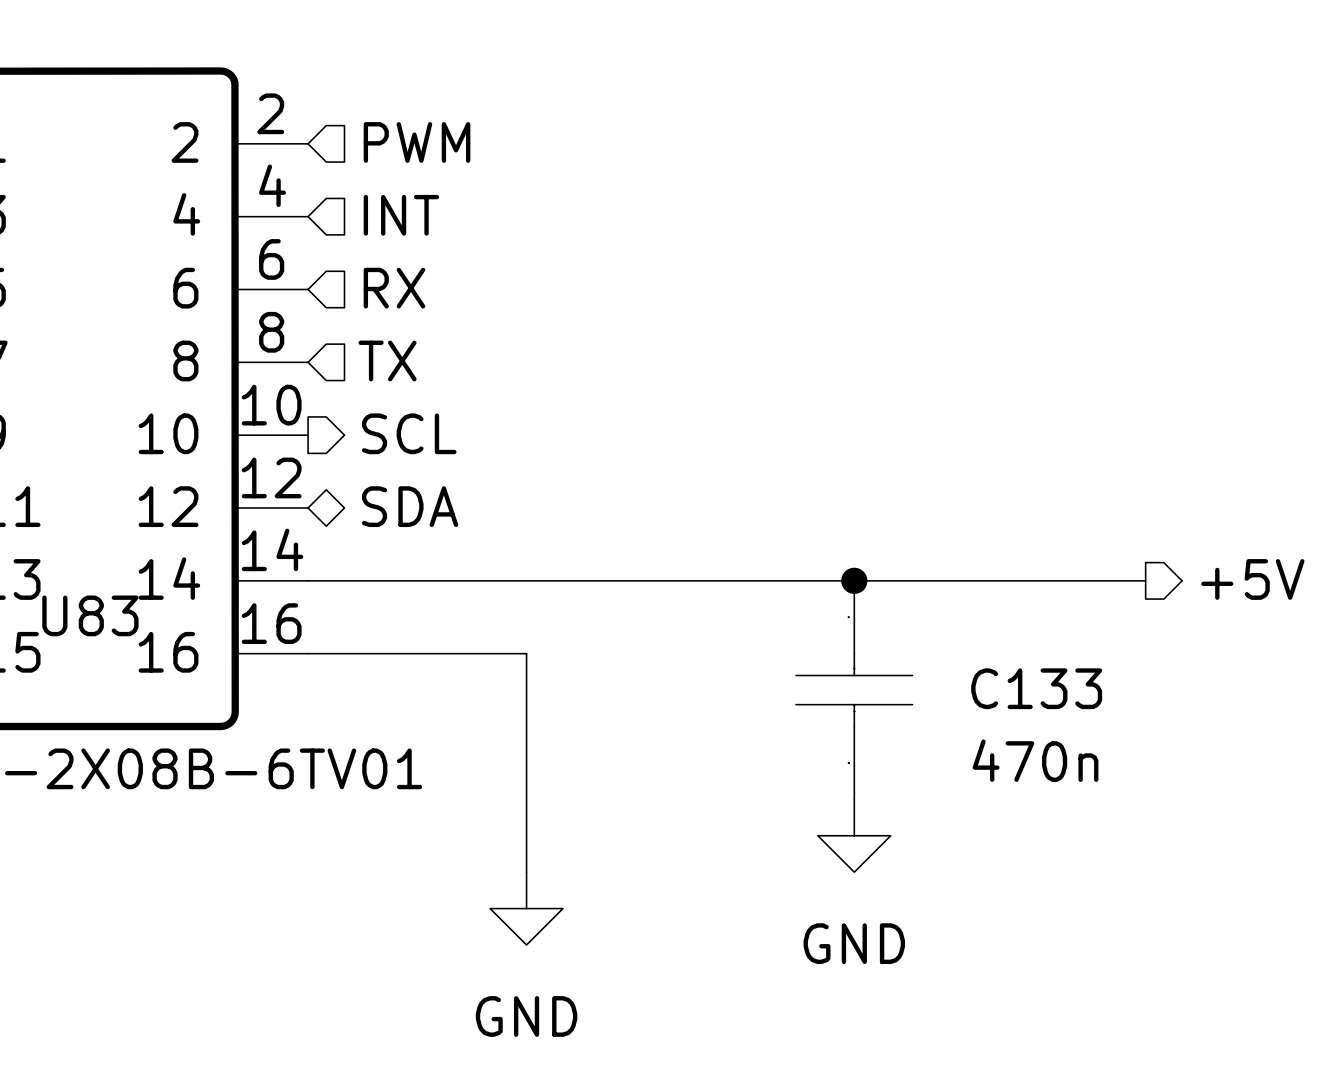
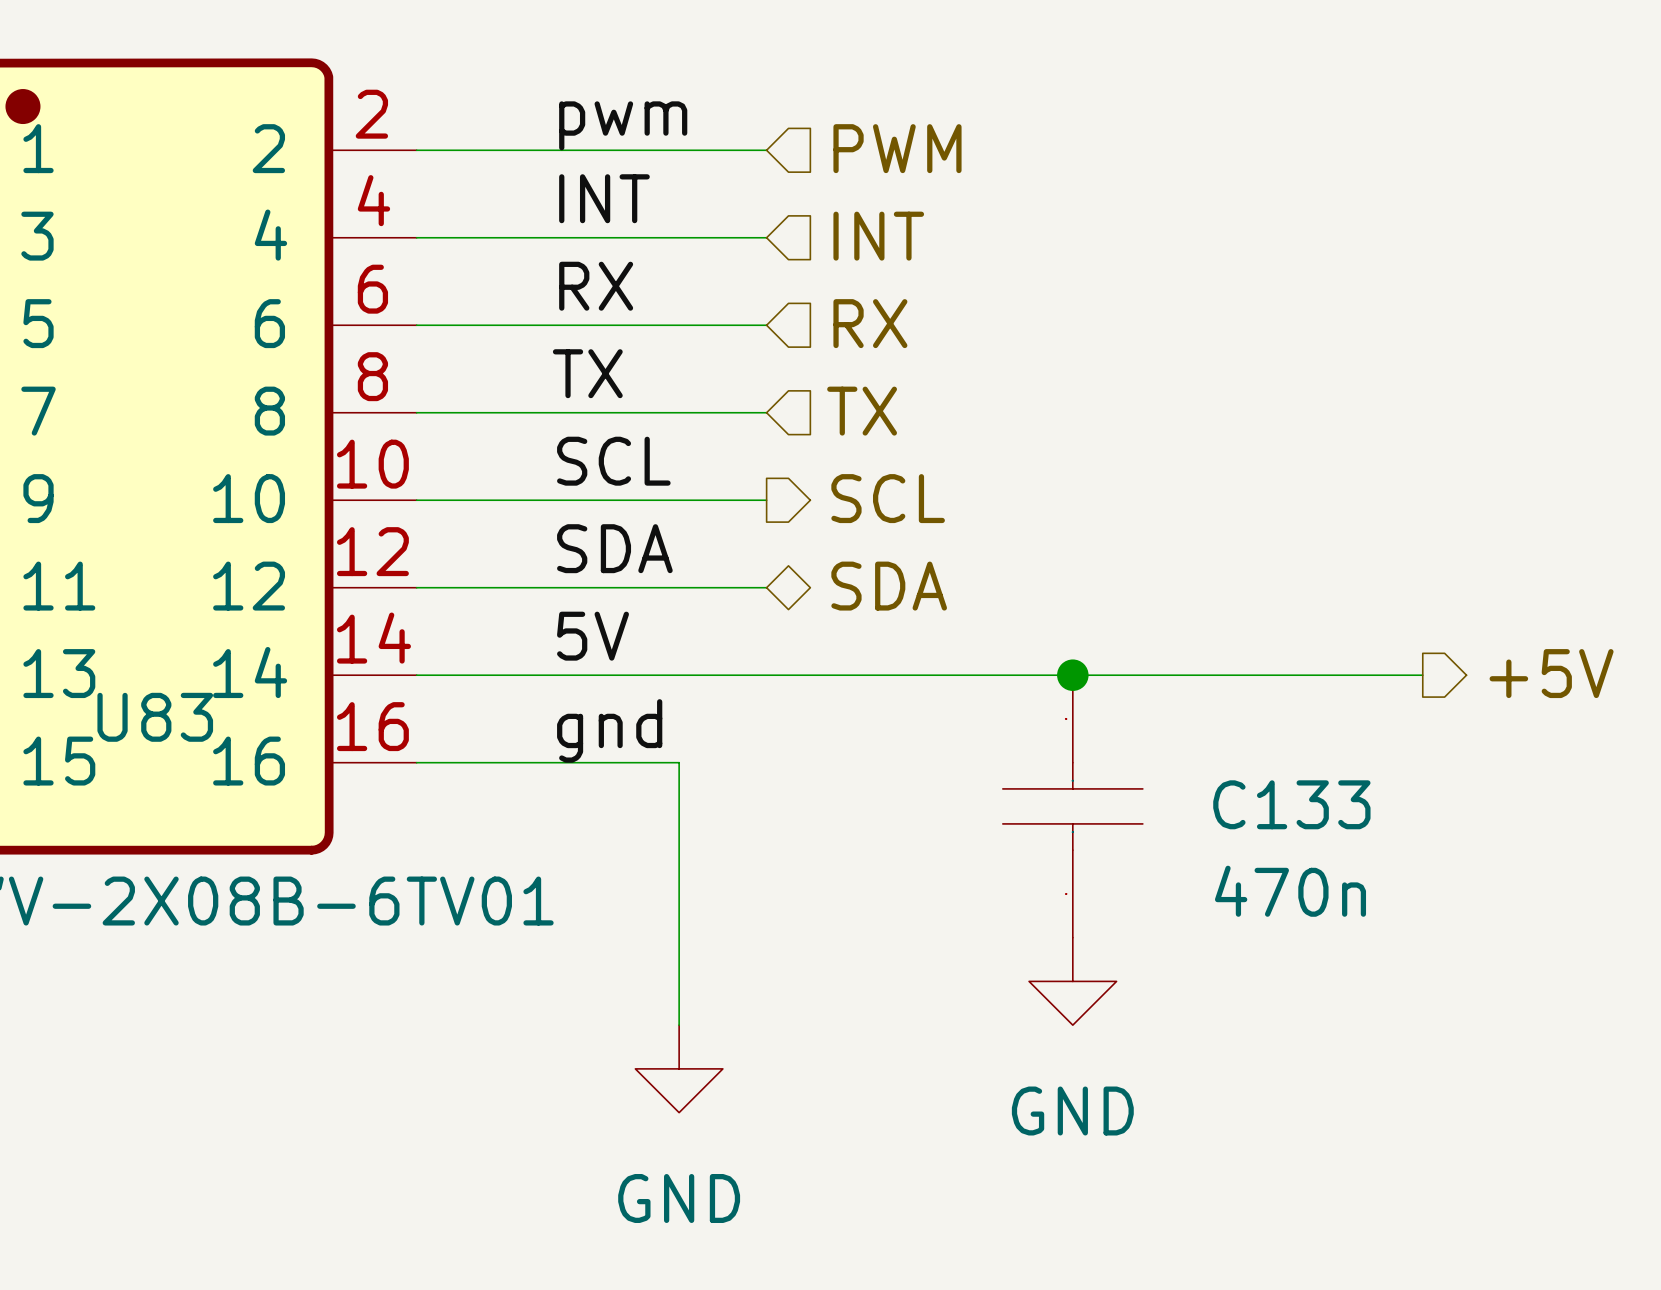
label: none -> pwm (623, 125)
hierarchical label position: PWM (417, 142) -> PWM (897, 148)
wire: none -> (416, 150) (766, 150)
label: none -> INT (604, 198)
hierarchical label position: INT (401, 215) -> INT (878, 236)
wire: none -> (416, 237) (766, 237)
label: none -> RX (596, 286)
hierarchical label position: RX (394, 288) -> RX (870, 323)
wire: none -> (416, 325) (766, 325)
label: none -> TX (587, 373)
hierarchical label position: TX (387, 360) -> TX (862, 411)
wire: none -> (416, 412) (766, 412)
label: none -> SCL (613, 461)
hierarchical label position: SCL (409, 433) -> SCL (888, 498)
wire: none -> (416, 500) (766, 500)
label: none -> SDA (614, 548)
hierarchical label position: SDA (410, 506) -> SDA (889, 586)
wire: none -> (416, 587) (766, 587)
label: none -> 5V (593, 636)
label: none -> gnd (609, 730)

